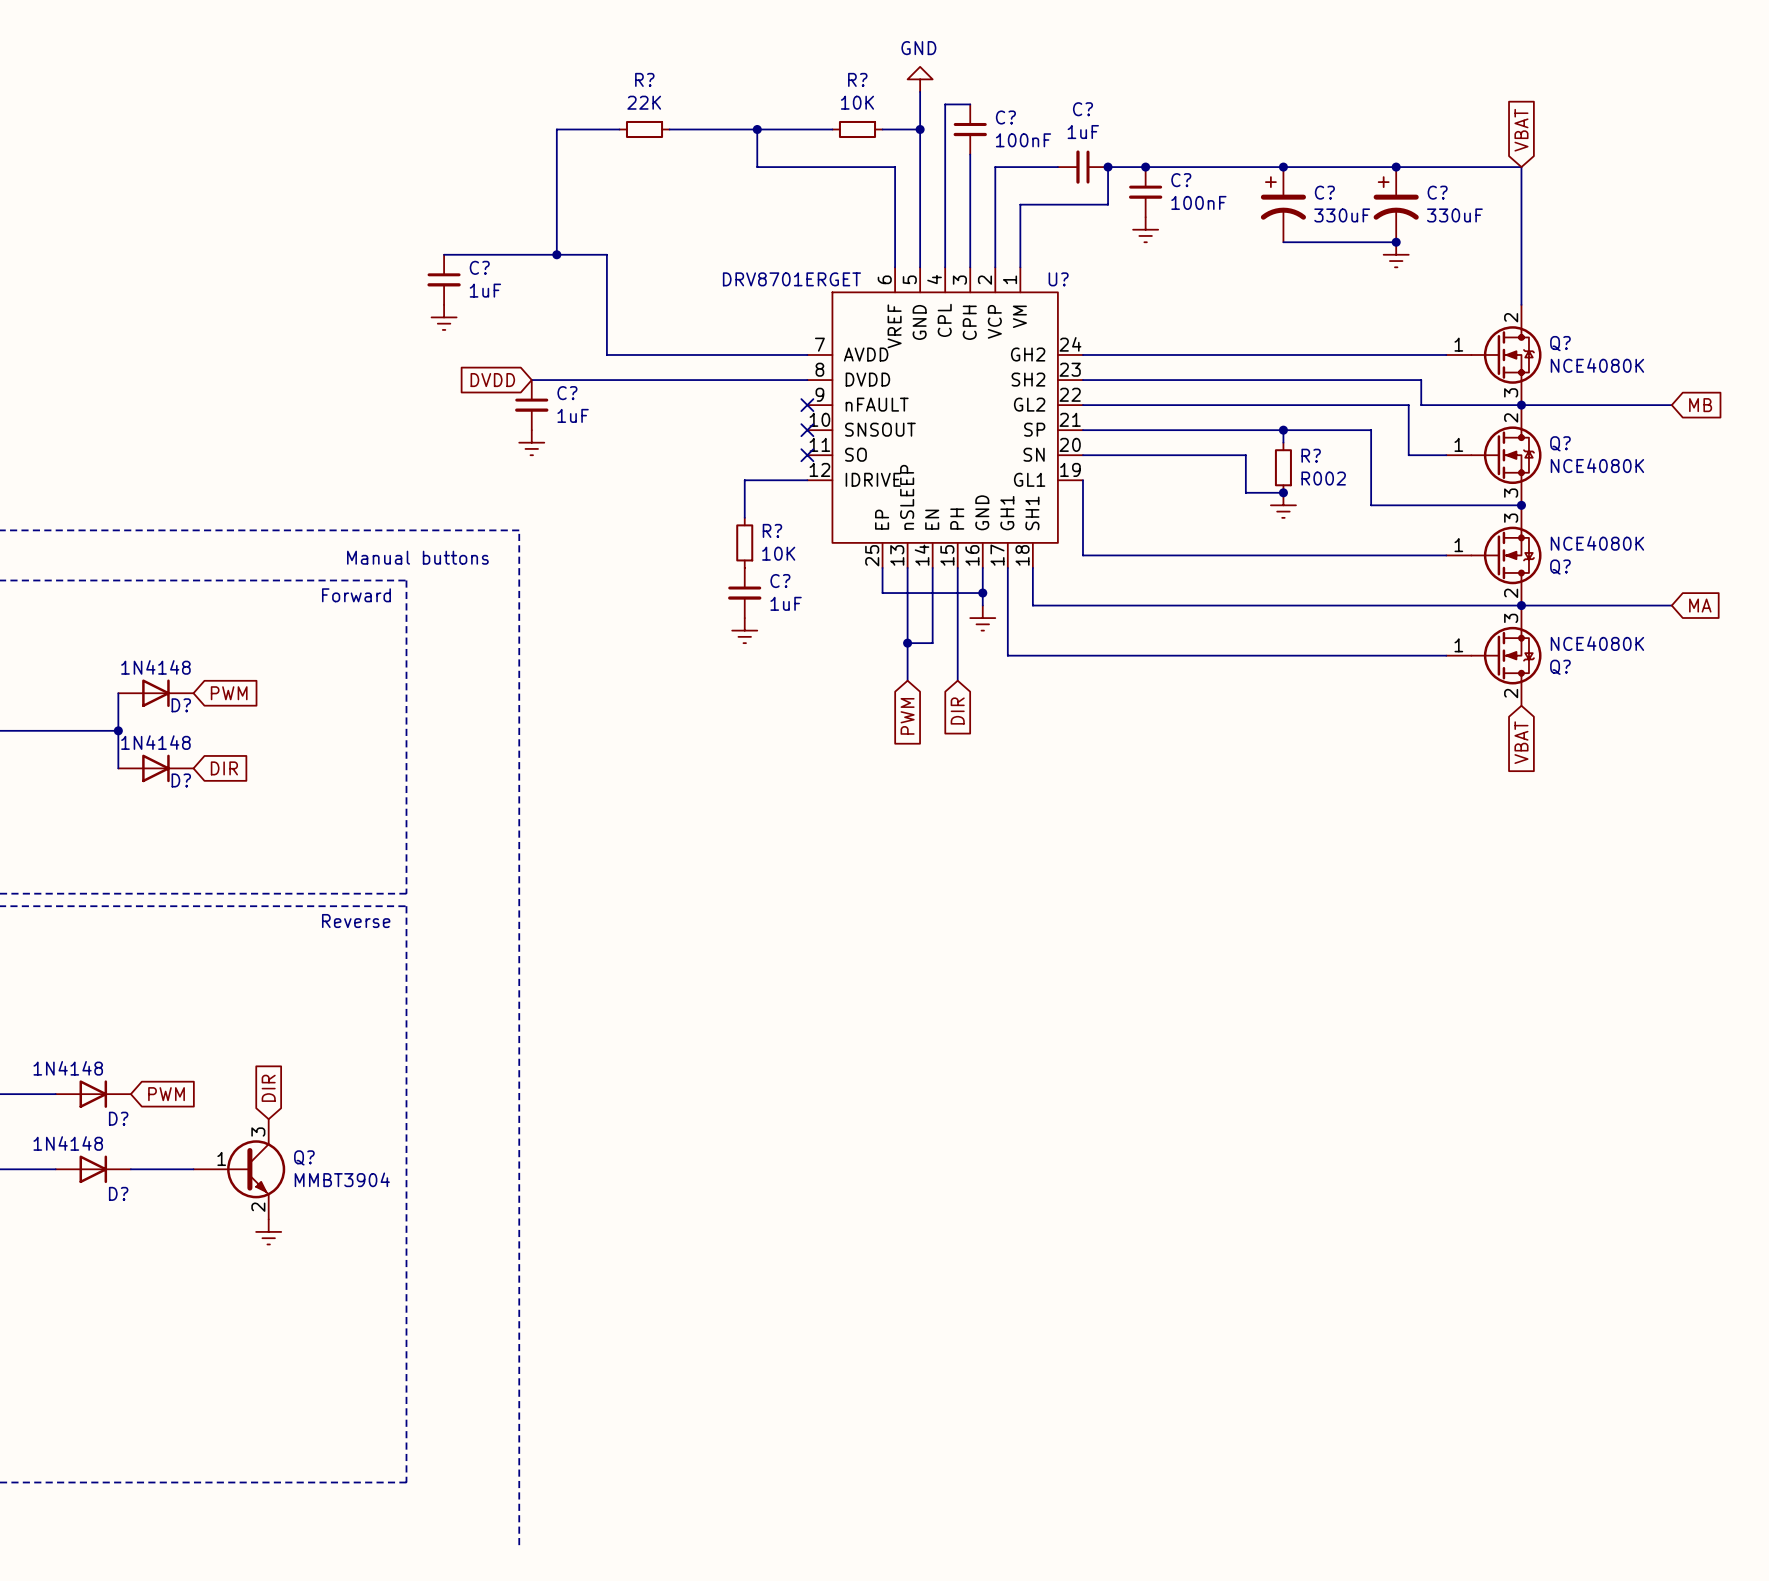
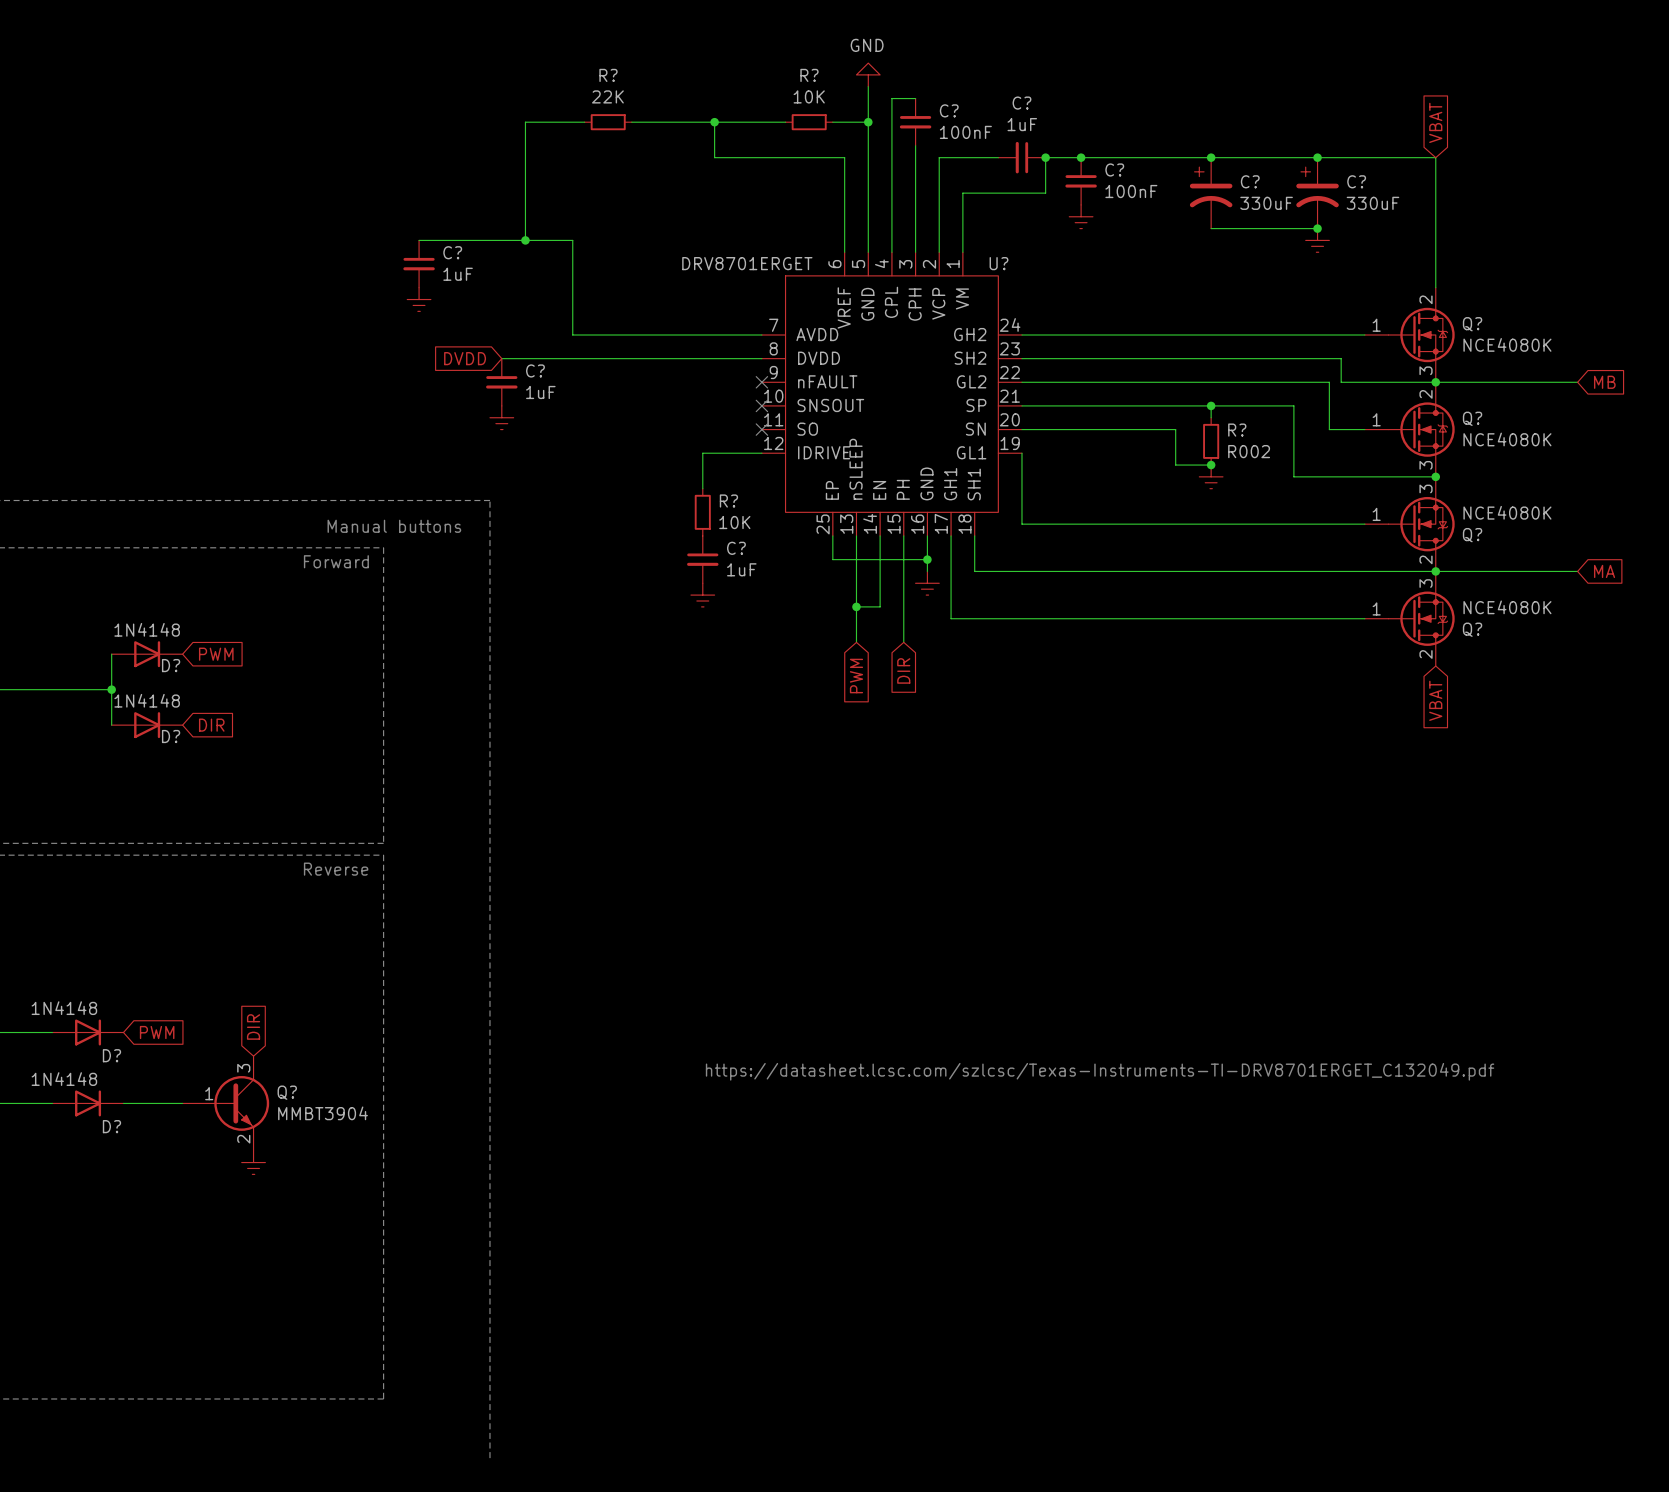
text: none -> https://datasheet.lcsc.com/szlcsc/Texas-Instruments-TI-DRV8701ERGET_C132049.pdf (1100, 1071)

